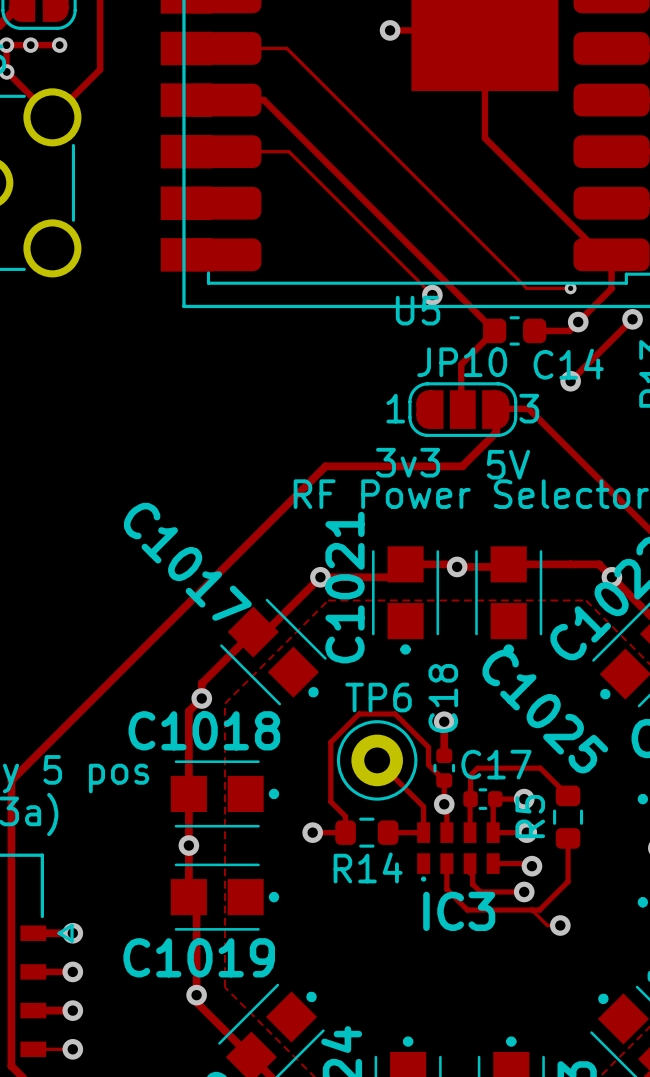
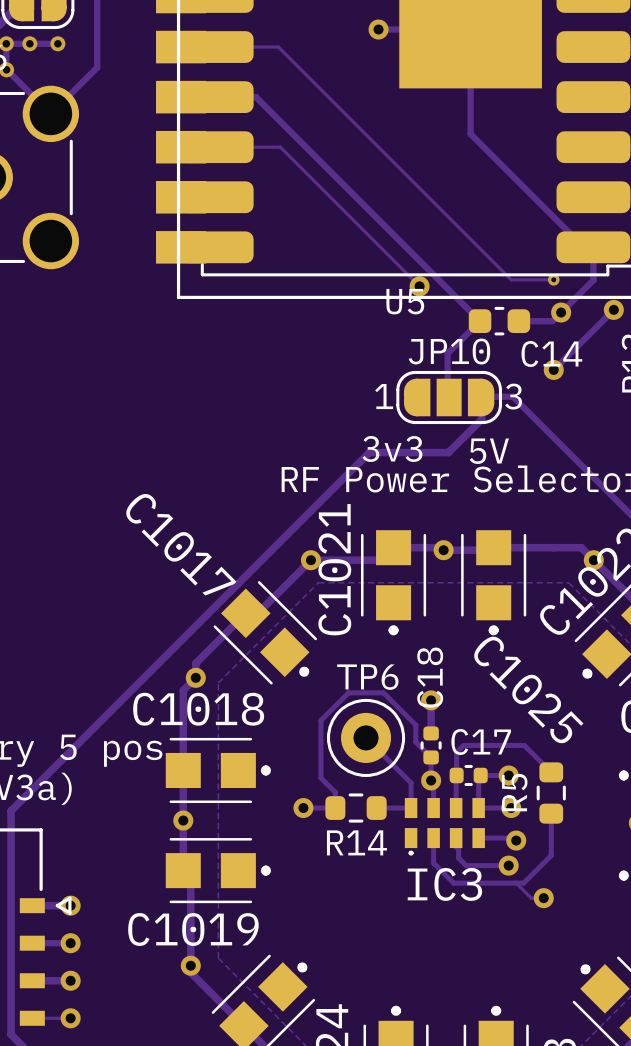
track: (380, 466) (325, 466) (11, 780) (11, 835) -> (369, 452) (11, 810)

